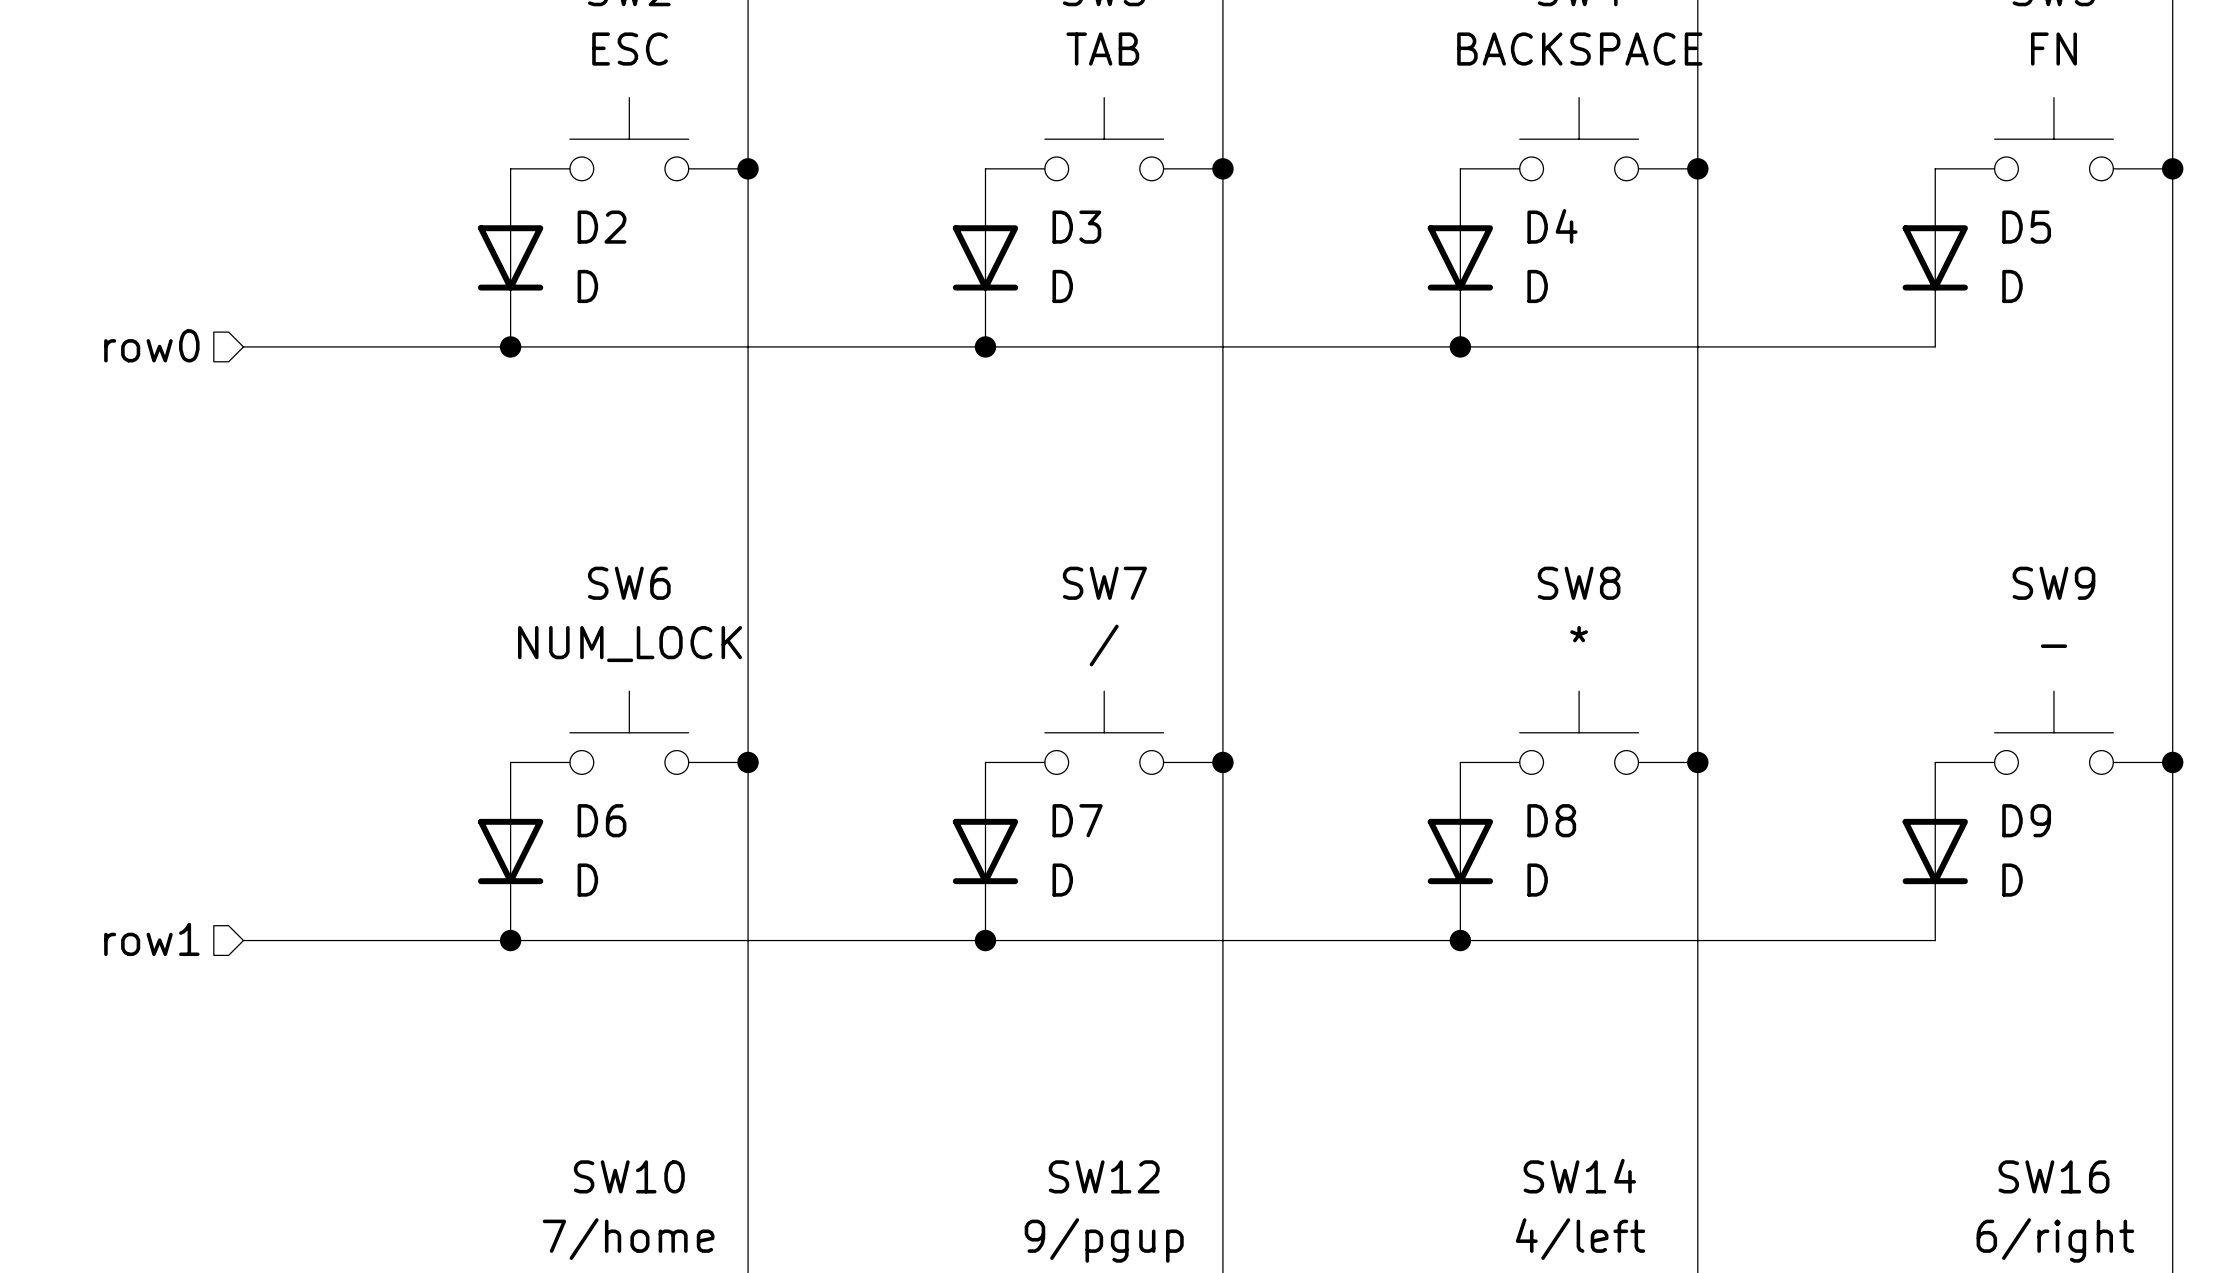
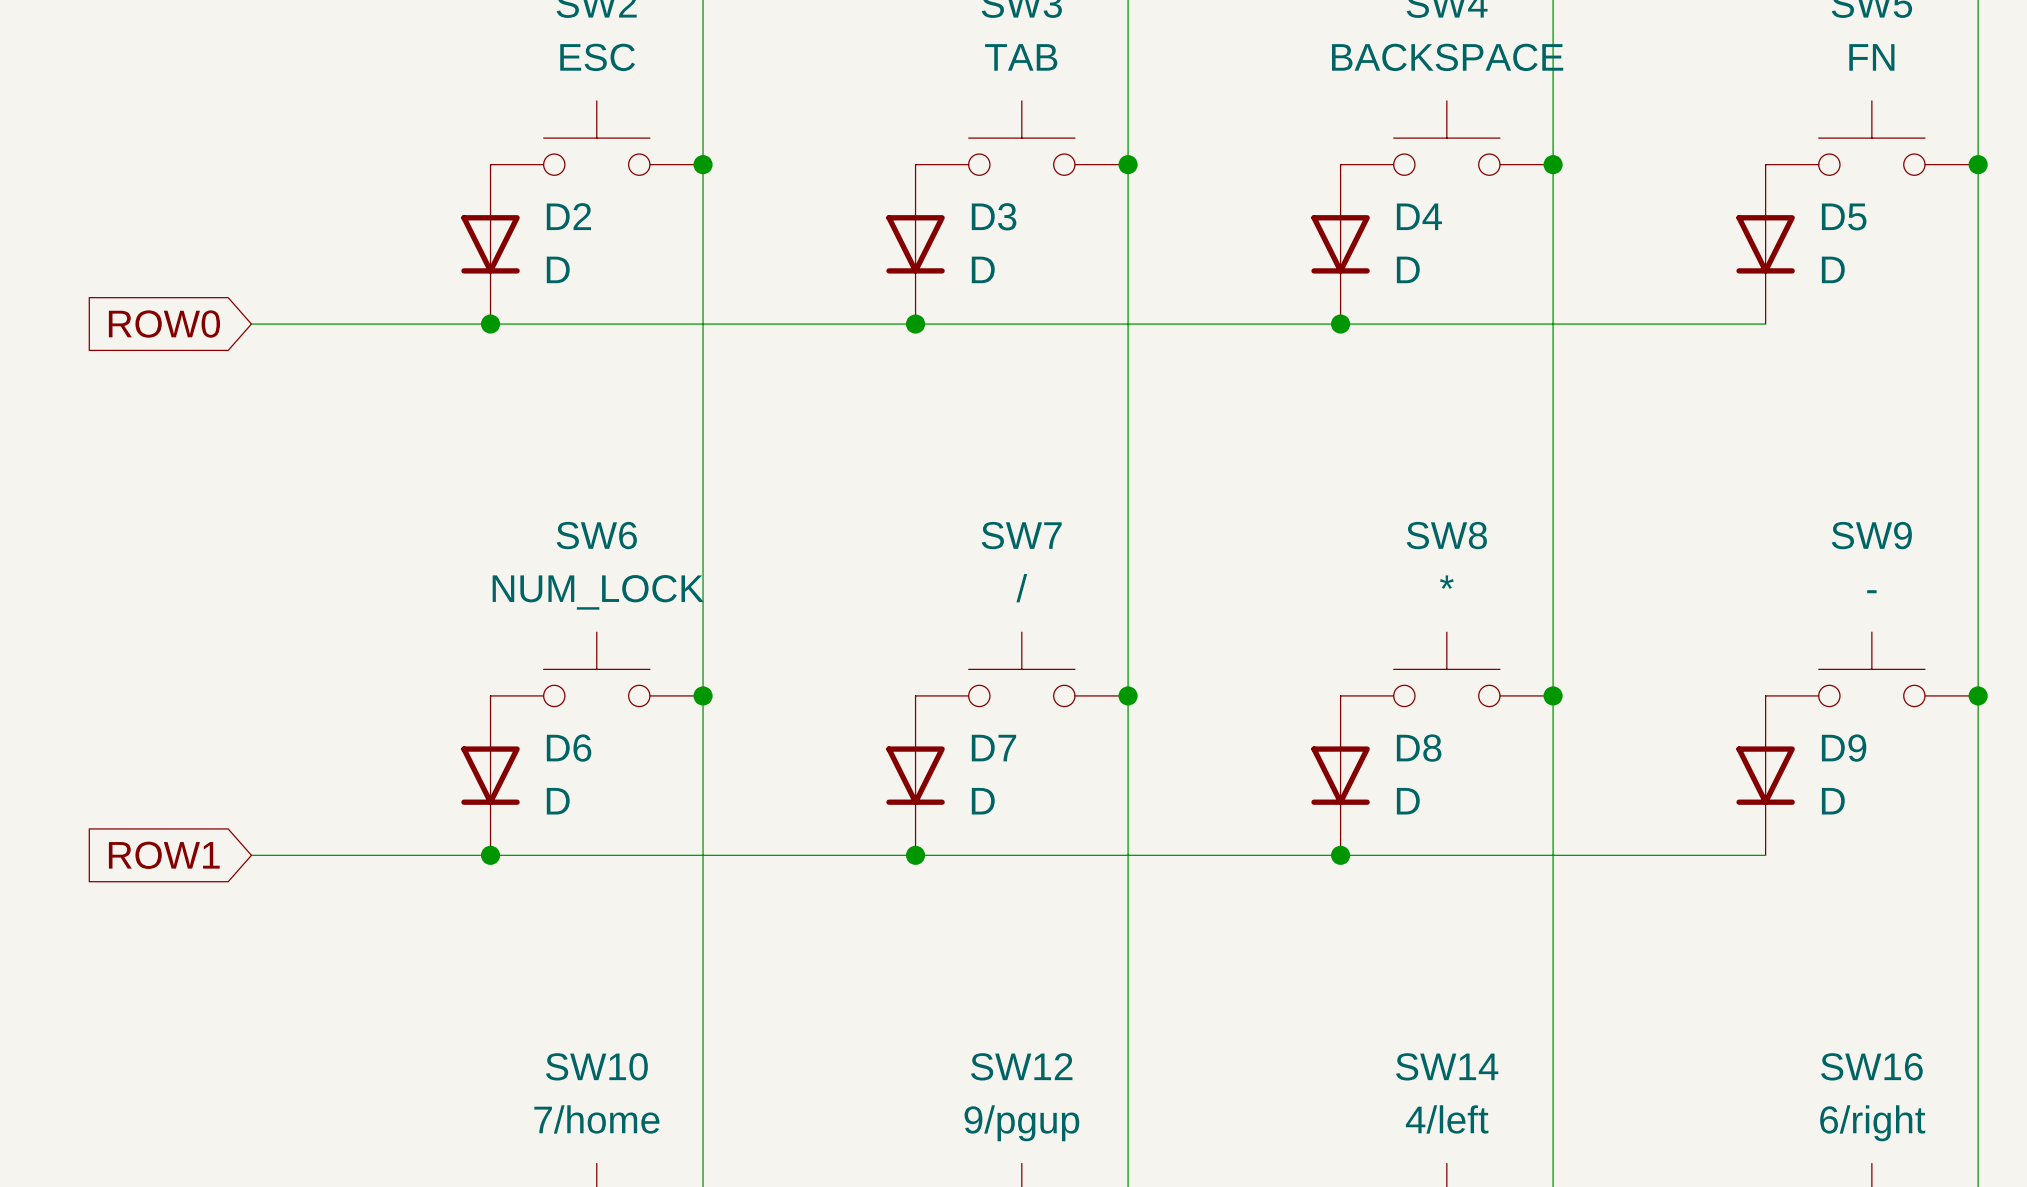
hierarchical label: row0 (151, 345) -> none
global label: none -> ROW0 (164, 324)
hierarchical label: row1 (151, 939) -> none
global label: none -> ROW1 (164, 855)

